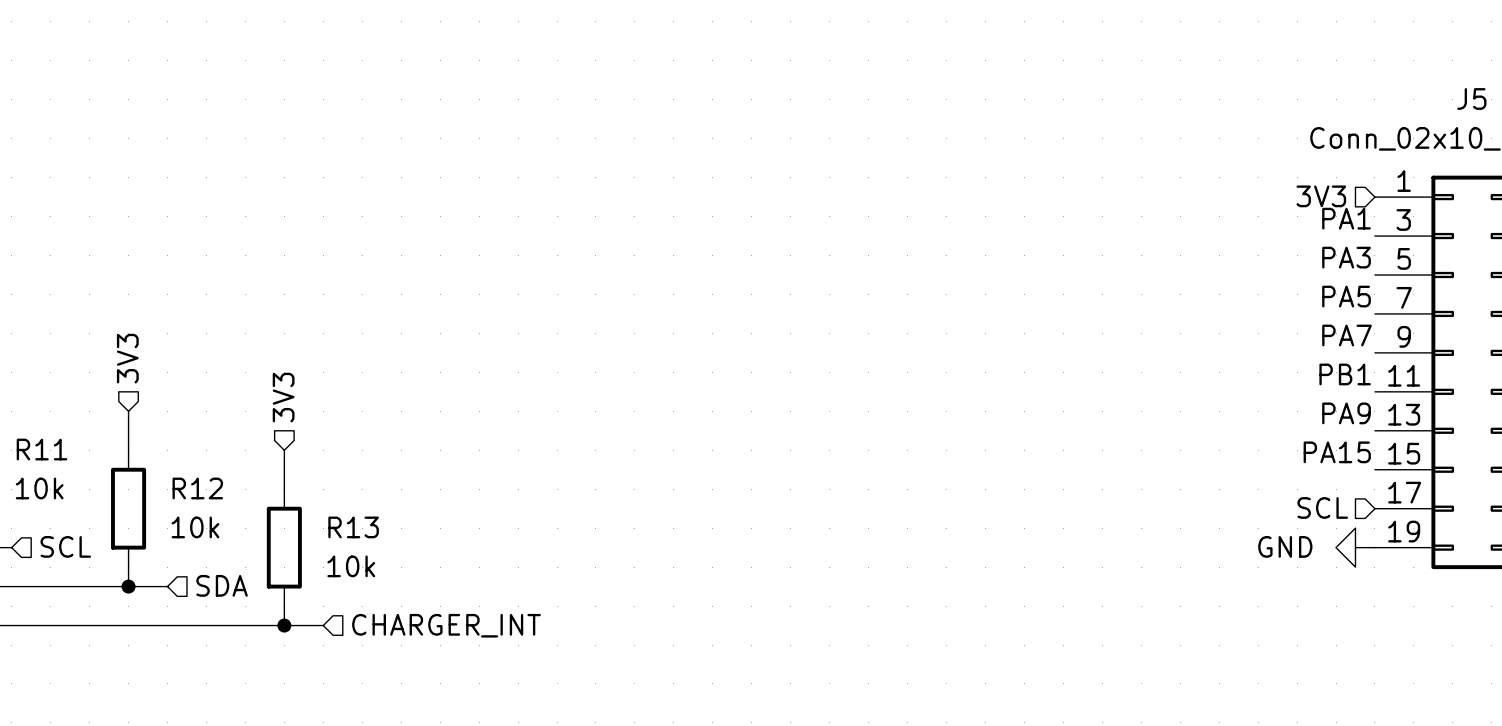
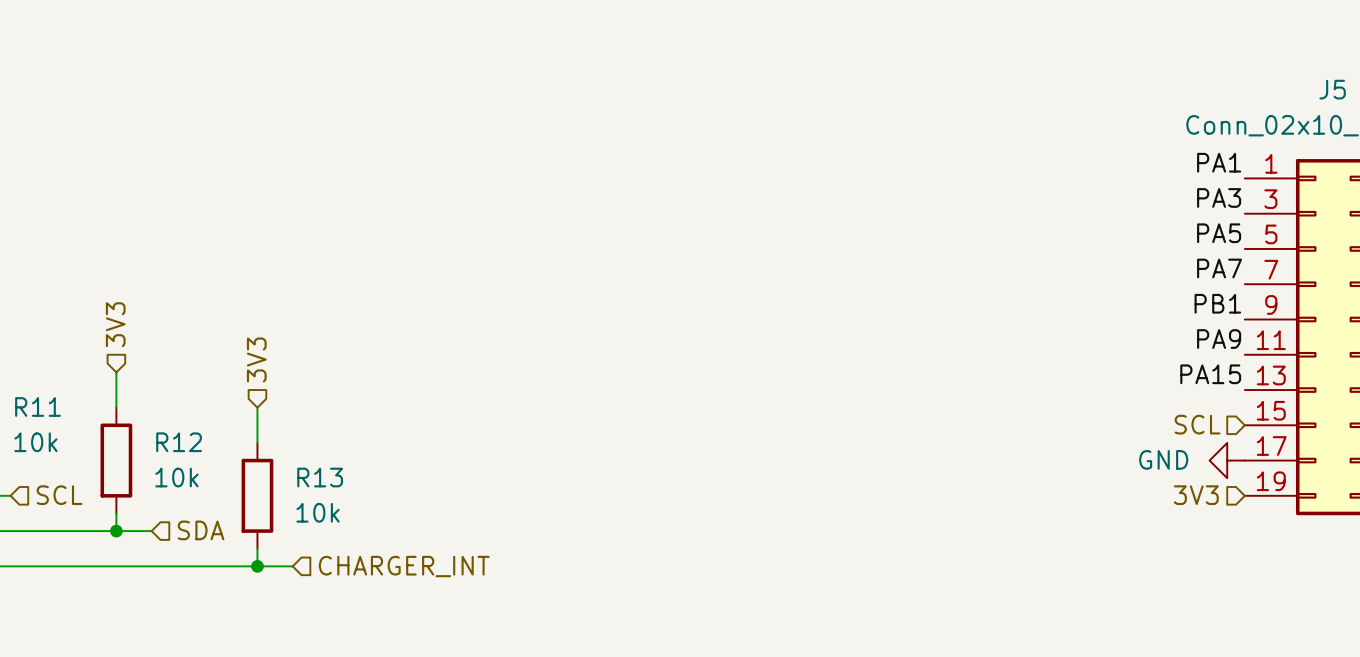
label: none -> PA1 (1219, 162)
hierarchical label position: 3V3 (1321, 196) -> 3V3 (1196, 495)
label: PA1 (1346, 218) -> PA3 (1219, 197)
label: PA3 (1346, 257) -> PA5 (1219, 233)
label: PA5 (1346, 296) -> PA7 (1219, 268)
label: PA7 (1346, 335) -> PB1 (1217, 303)
label: PB1 (1345, 374) -> PA9 (1219, 339)
label: PA9 (1346, 413) -> PA15 (1210, 374)
label: PA15 (1337, 452) -> none
hierarchical label position: SCL (1322, 507) -> SCL (1197, 424)
power symbol position: GND (1355, 547) -> GND (1227, 460)

